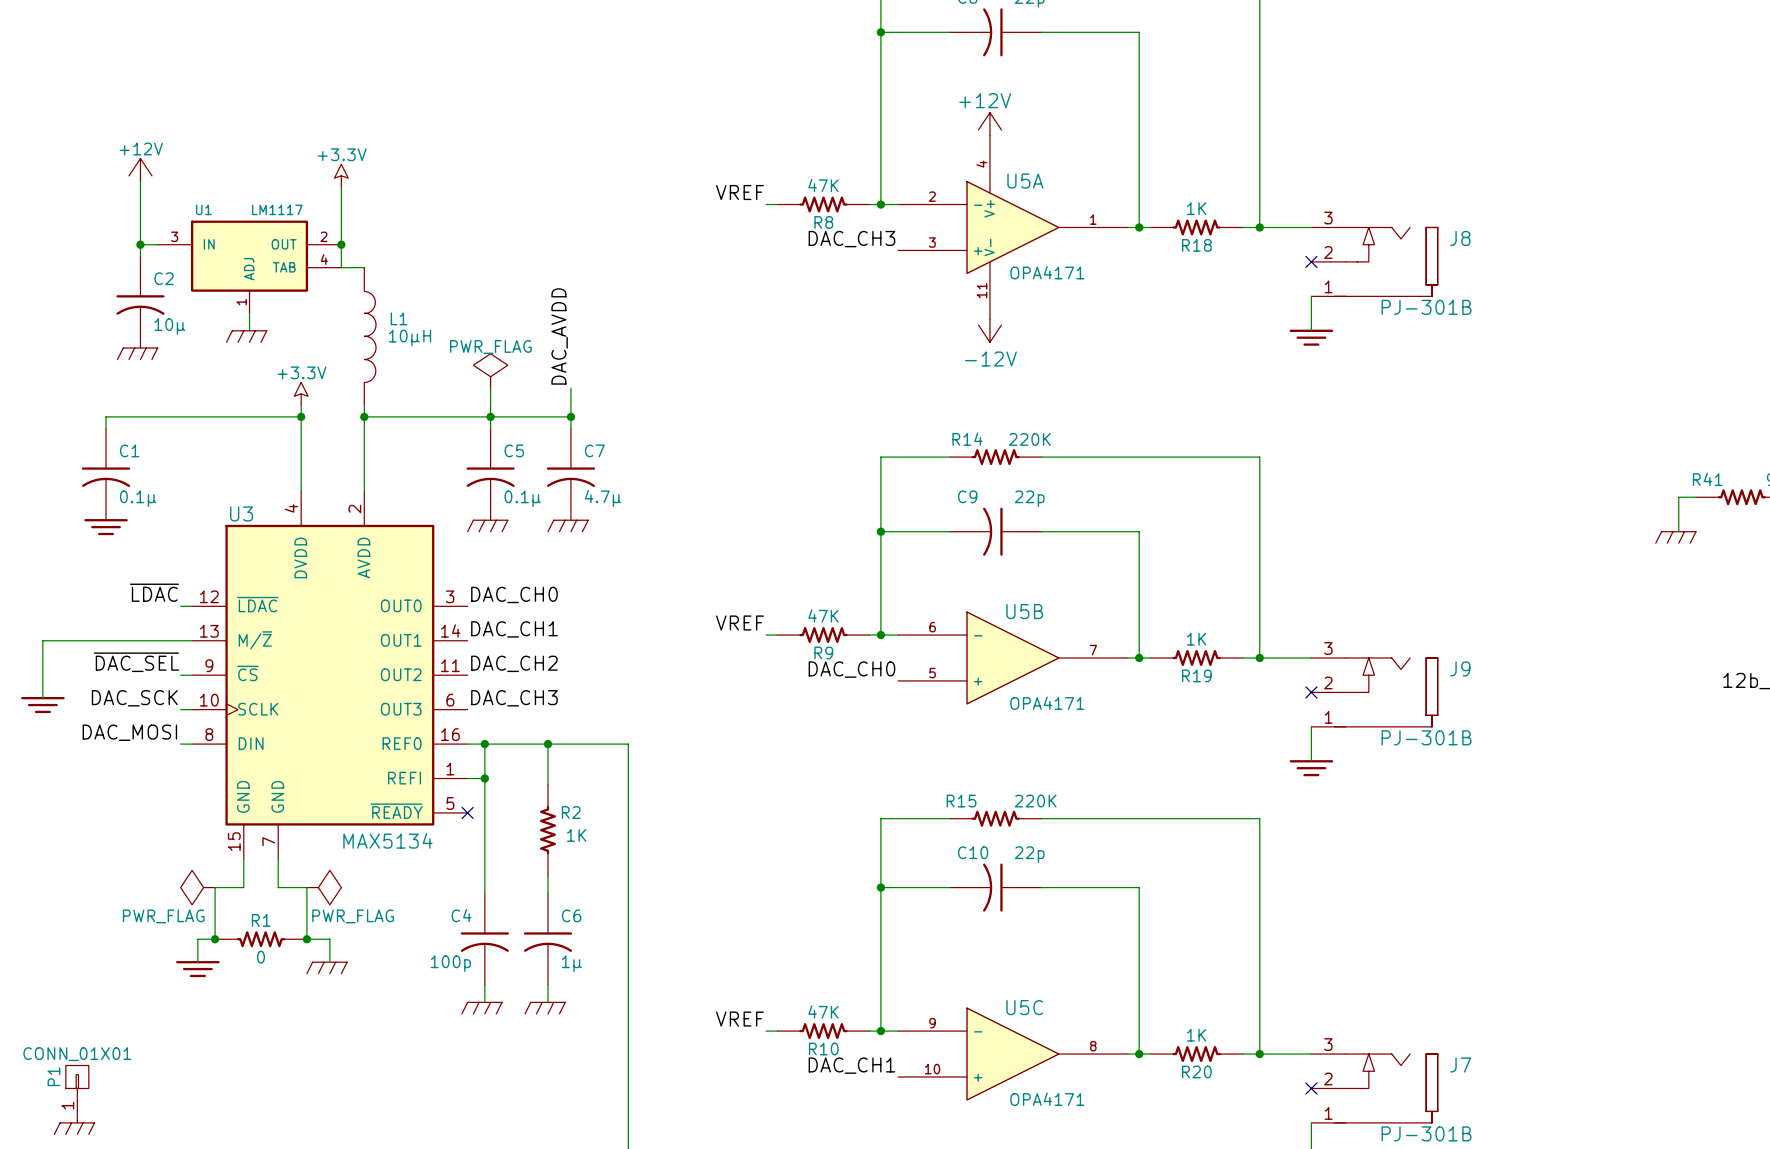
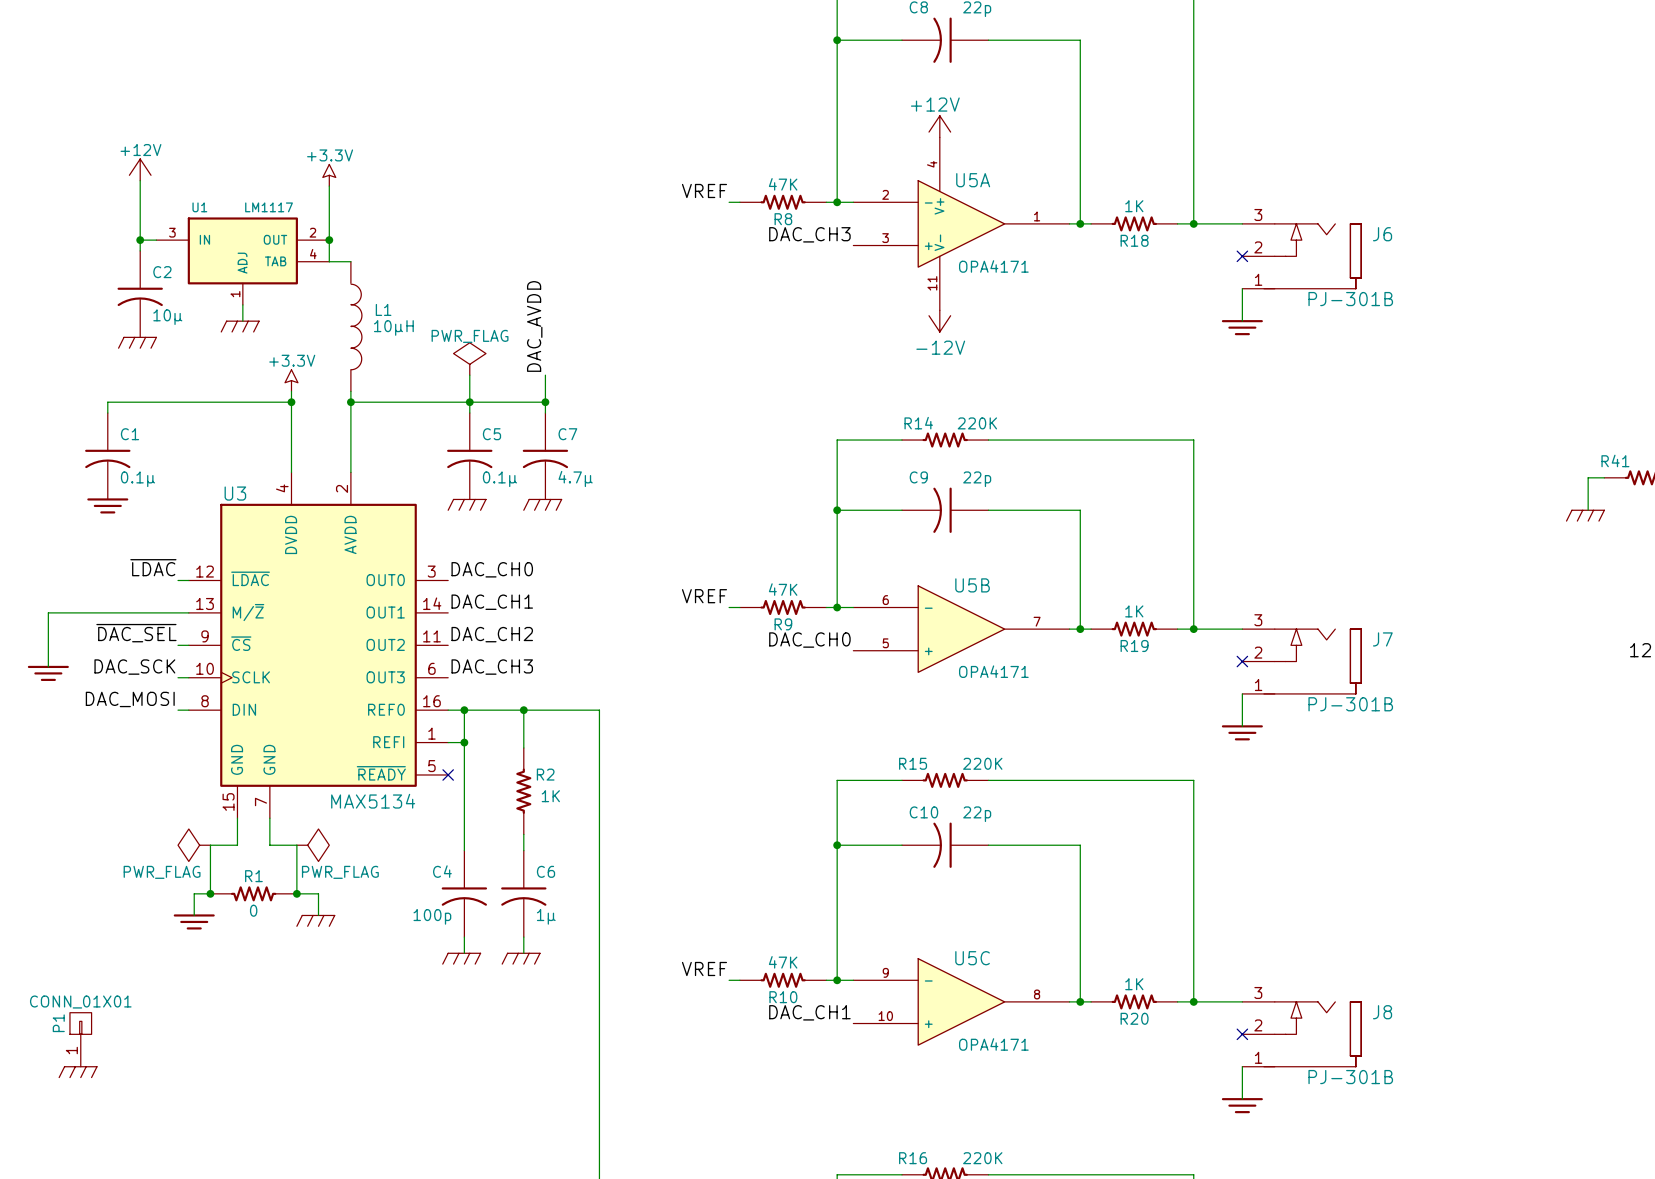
J8 name: J8 (1460, 238) -> J6 (1382, 234)
J9 name: J9 (1460, 668) -> J7 (1382, 639)
J7 name: J7 (1460, 1065) -> J8 (1382, 1012)

